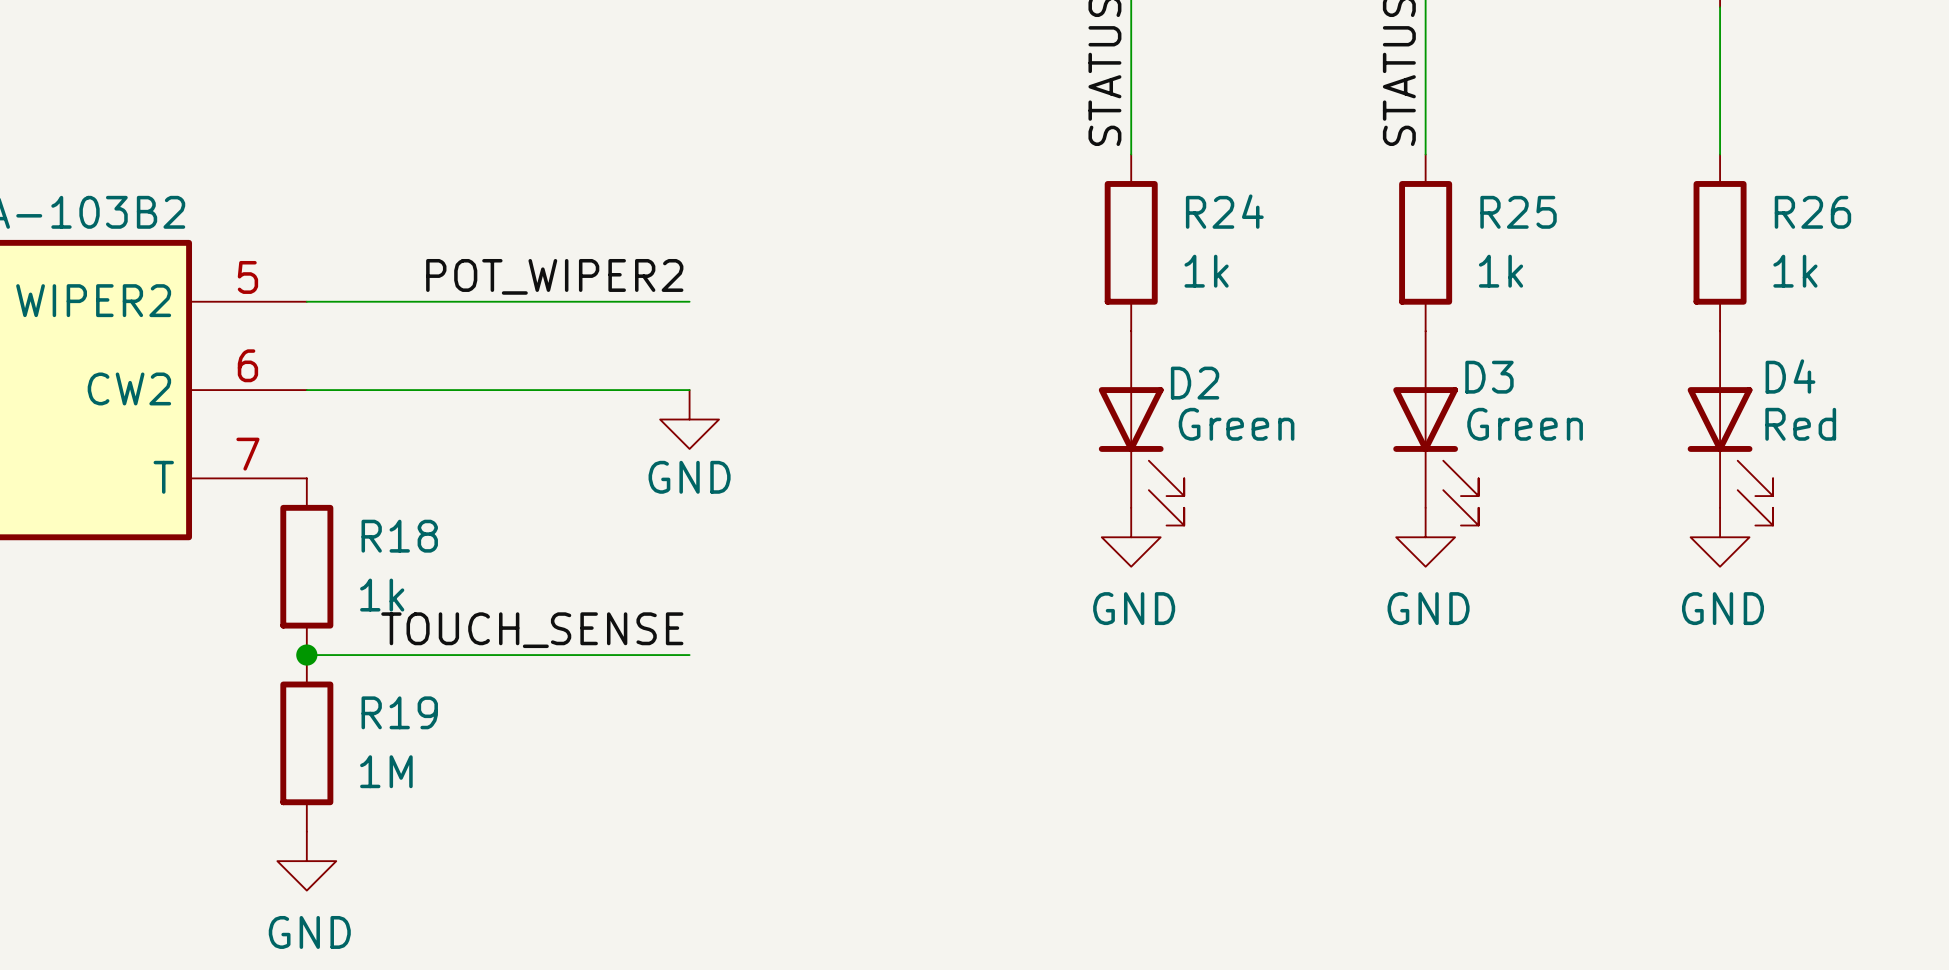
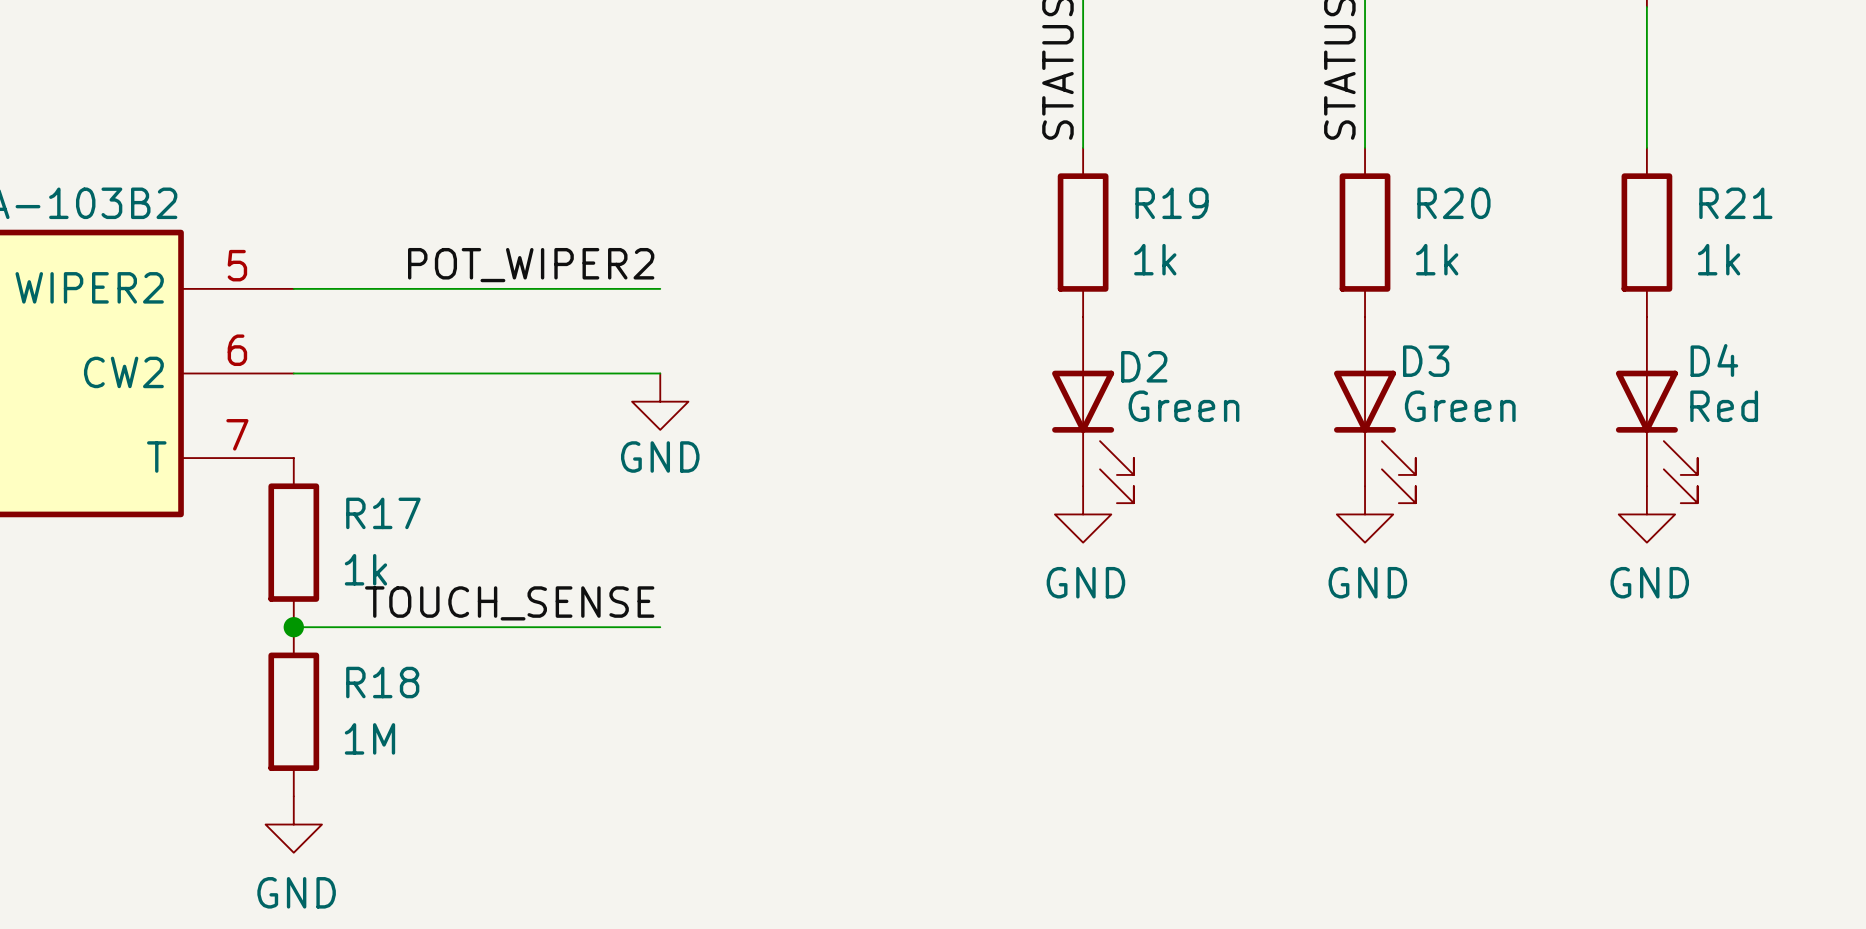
R24 name: R24 (1224, 211) -> R19 (1172, 203)
R25 name: R25 (1518, 212) -> R20 (1453, 203)
R26 name: R26 (1812, 212) -> R21 (1735, 203)
R18 name: R18 (399, 536) -> R17 (383, 513)
R19 name: R19 (399, 712) -> R18 (382, 682)

